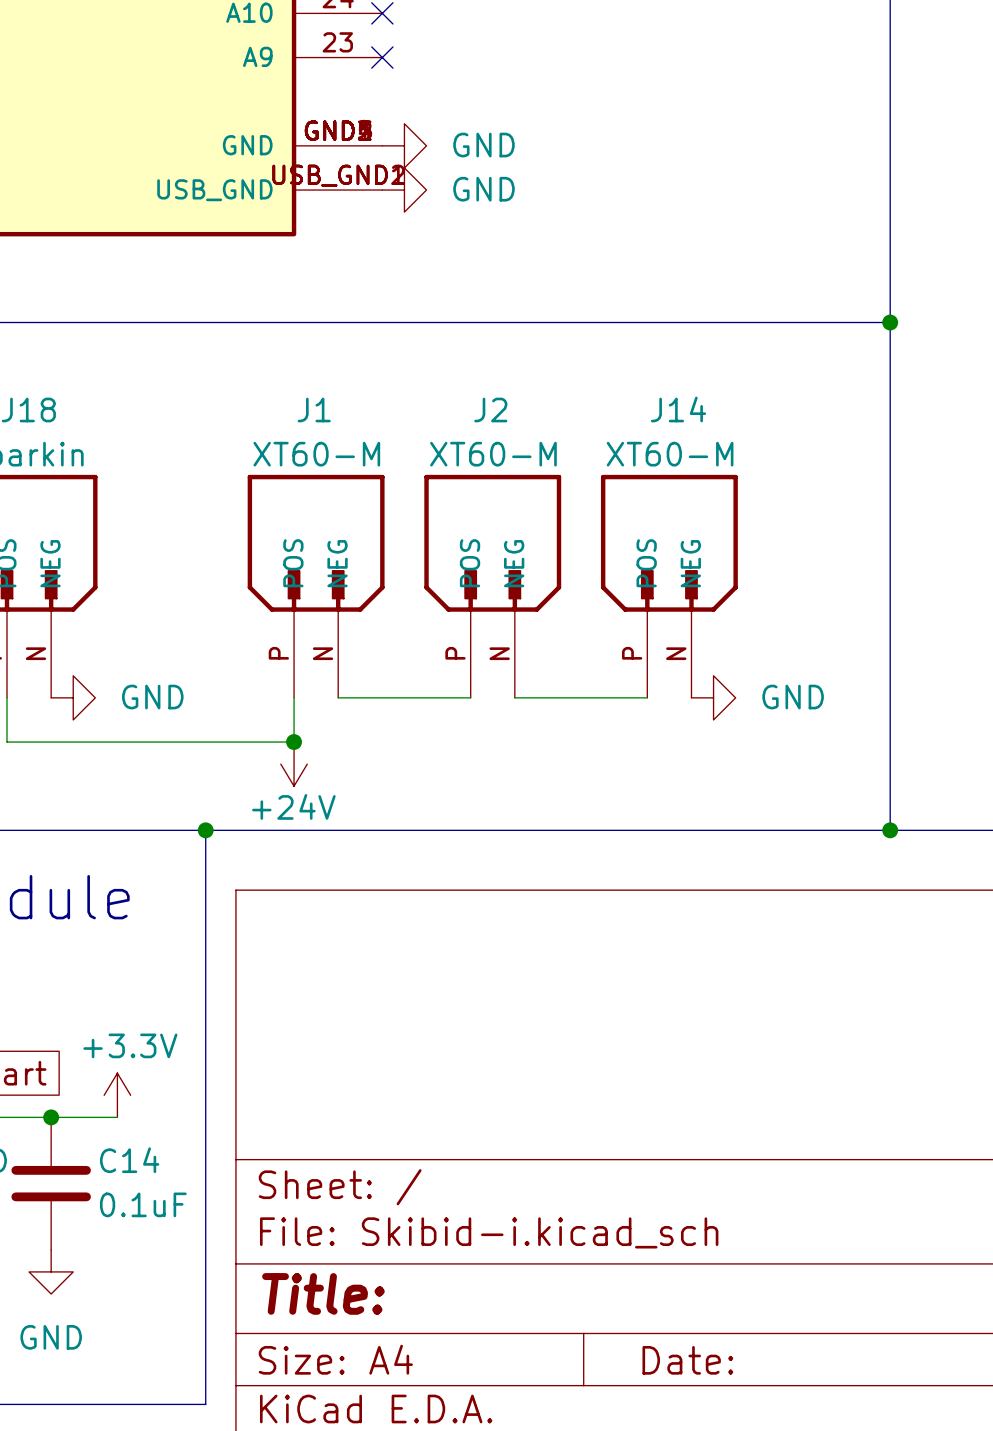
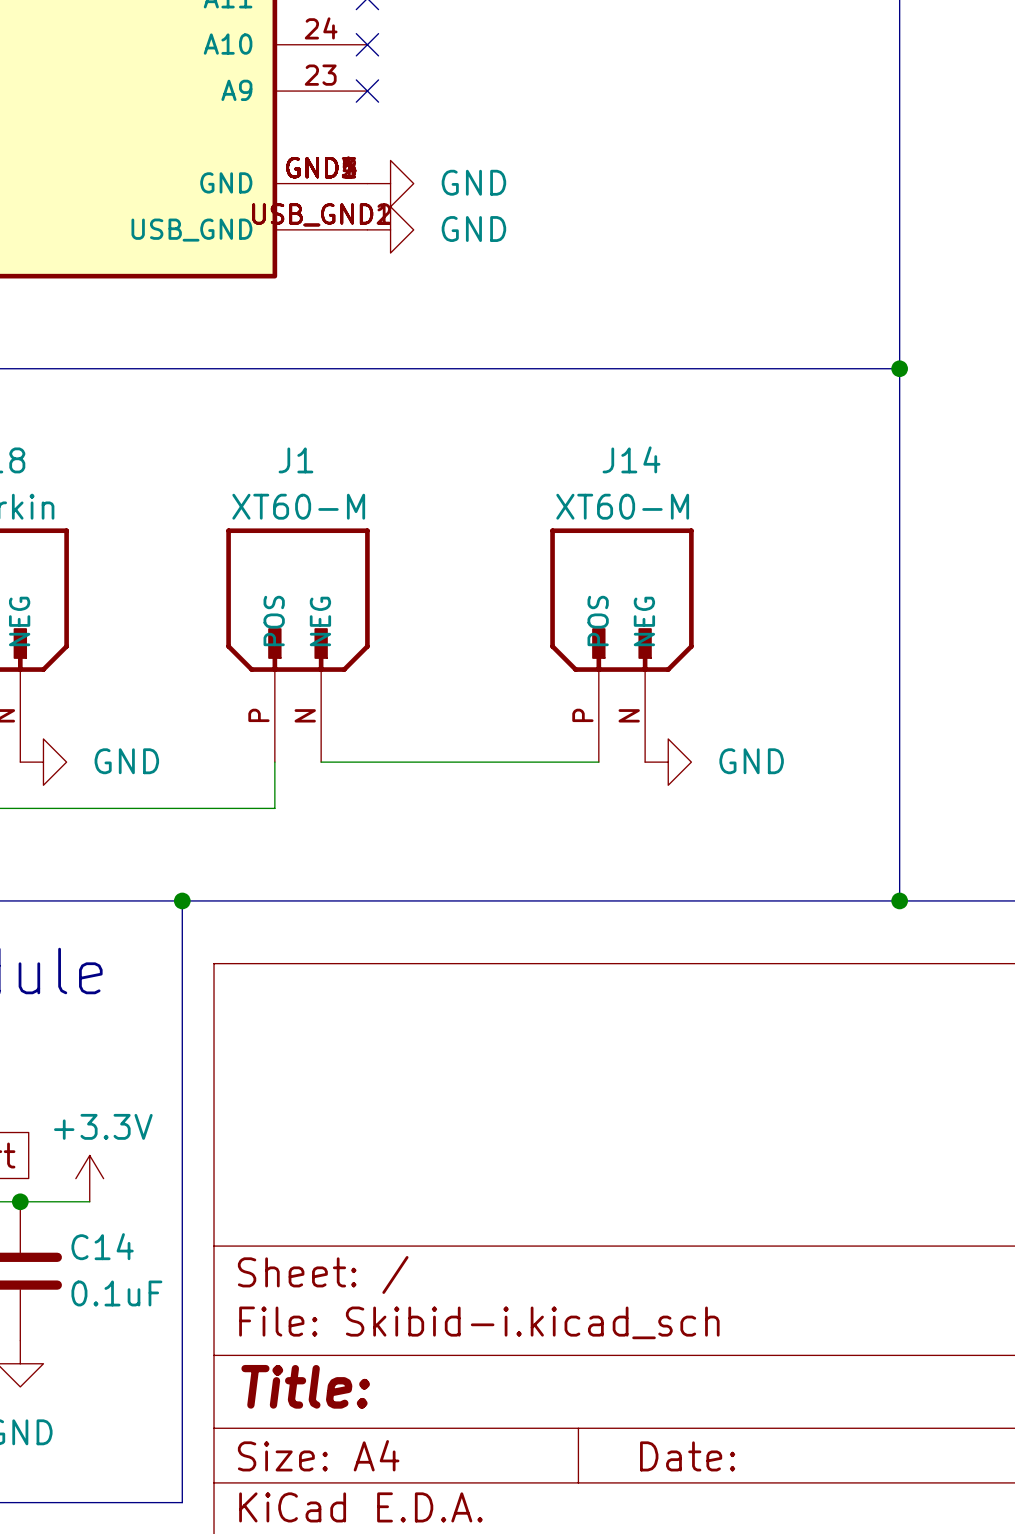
J2: XT60-M (492, 586) -> none
J14 position: (669, 586) -> (621, 645)
wire: (603, 697) (647, 697) -> (459, 762) (506, 762)
power symbol position: GND (713, 697) -> GND (668, 762)
junction: (294, 742) -> none
power symbol: +24V (294, 764) -> none

